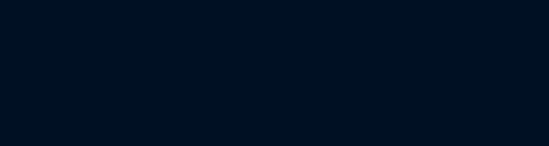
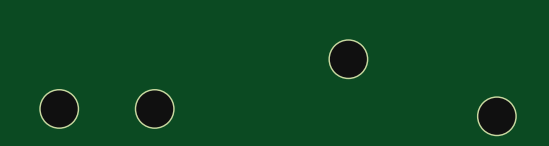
part: none -> (348, 59)
part: none -> (59, 108)
part: none -> (154, 108)
part: none -> (496, 116)

